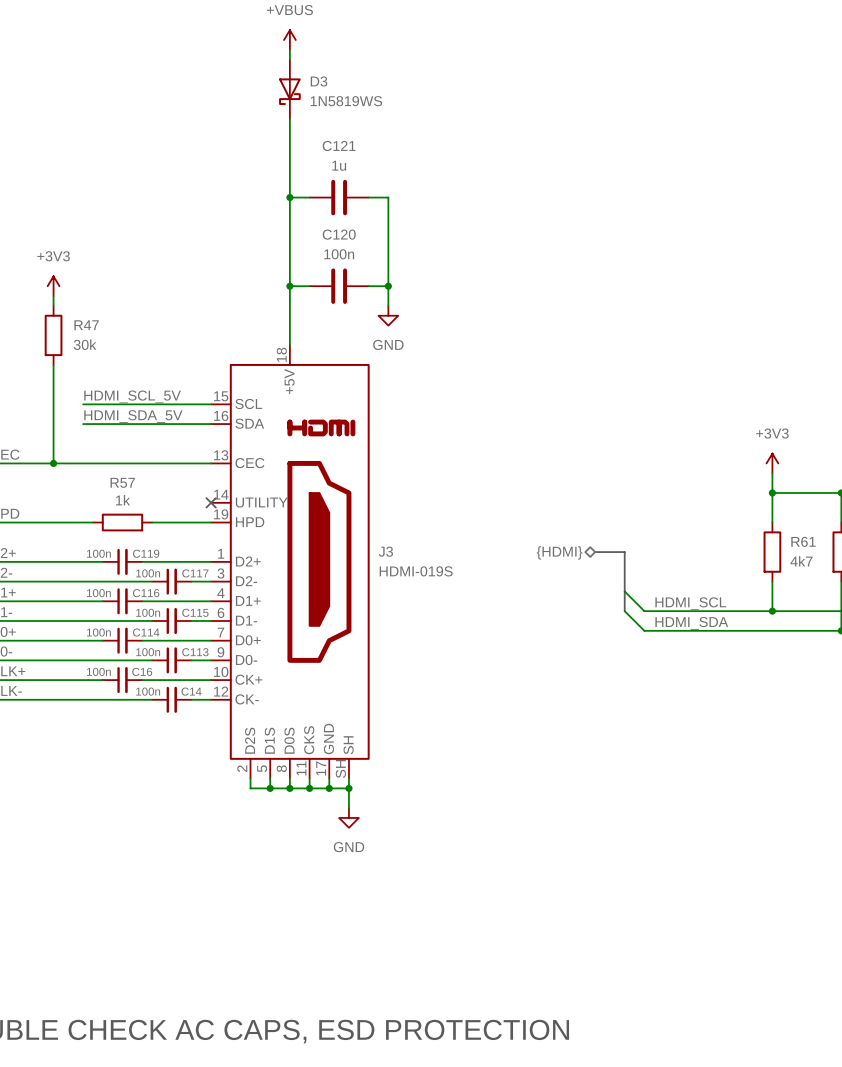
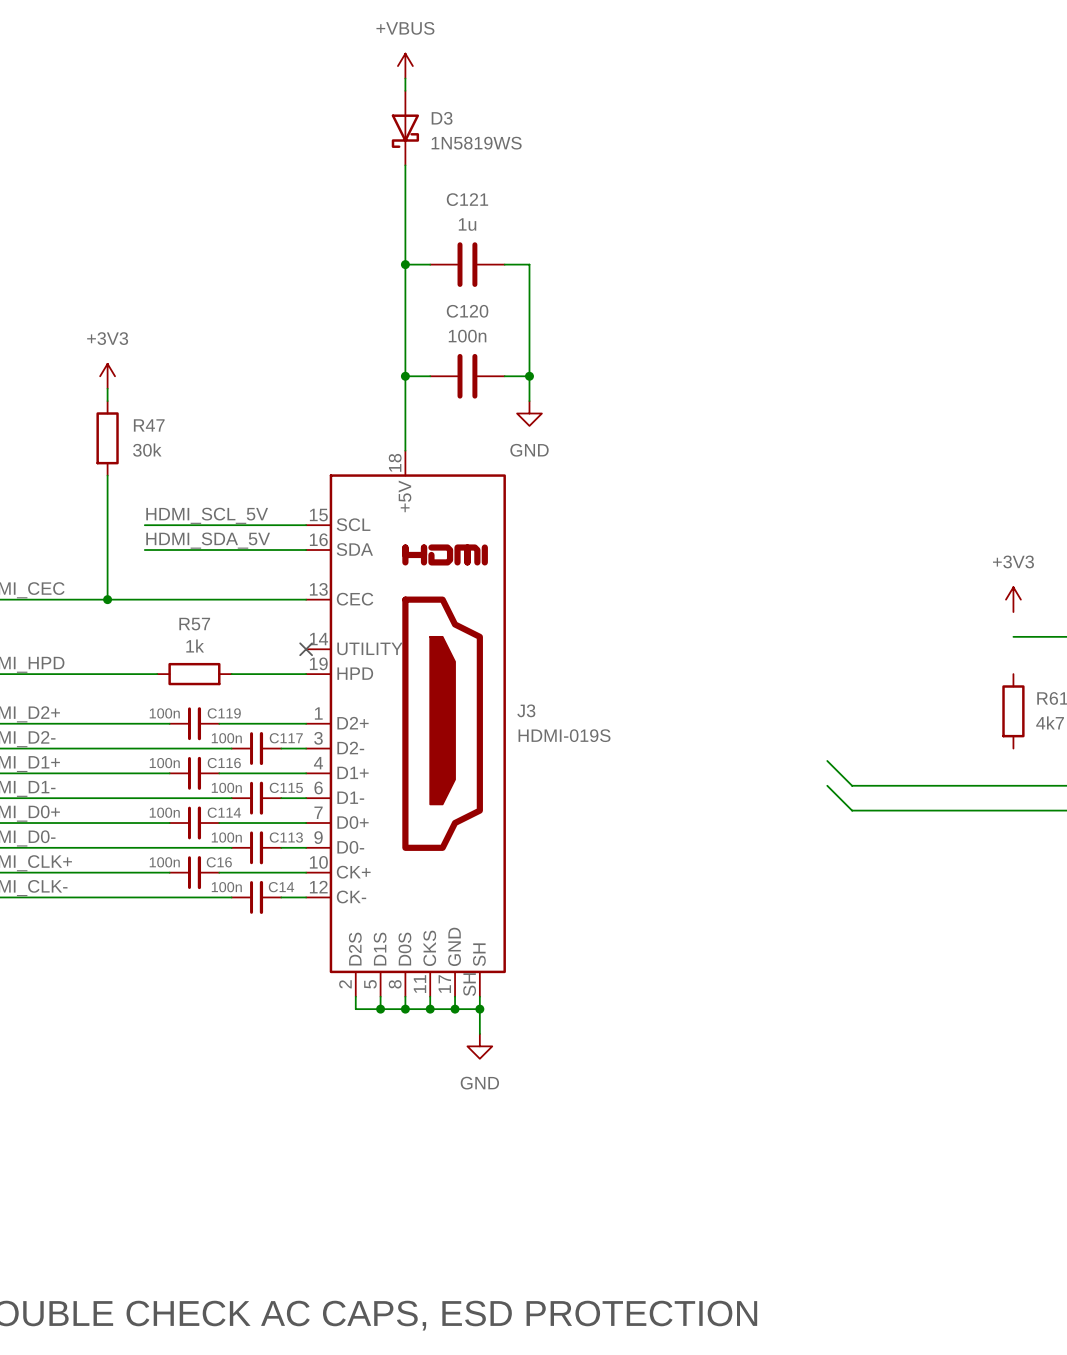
wire: (772, 473) (772, 522) -> none
junction: (772, 492) -> none
hierarchical label: {HDMI} (559, 552) -> none
bus: (595, 552) (624, 552) (624, 611) -> none
wire: (772, 581) (772, 611) -> none
label: HDMI_SCL (690, 603) -> none
junction: (772, 611) -> none
label: HDMI_SDA (691, 623) -> none

